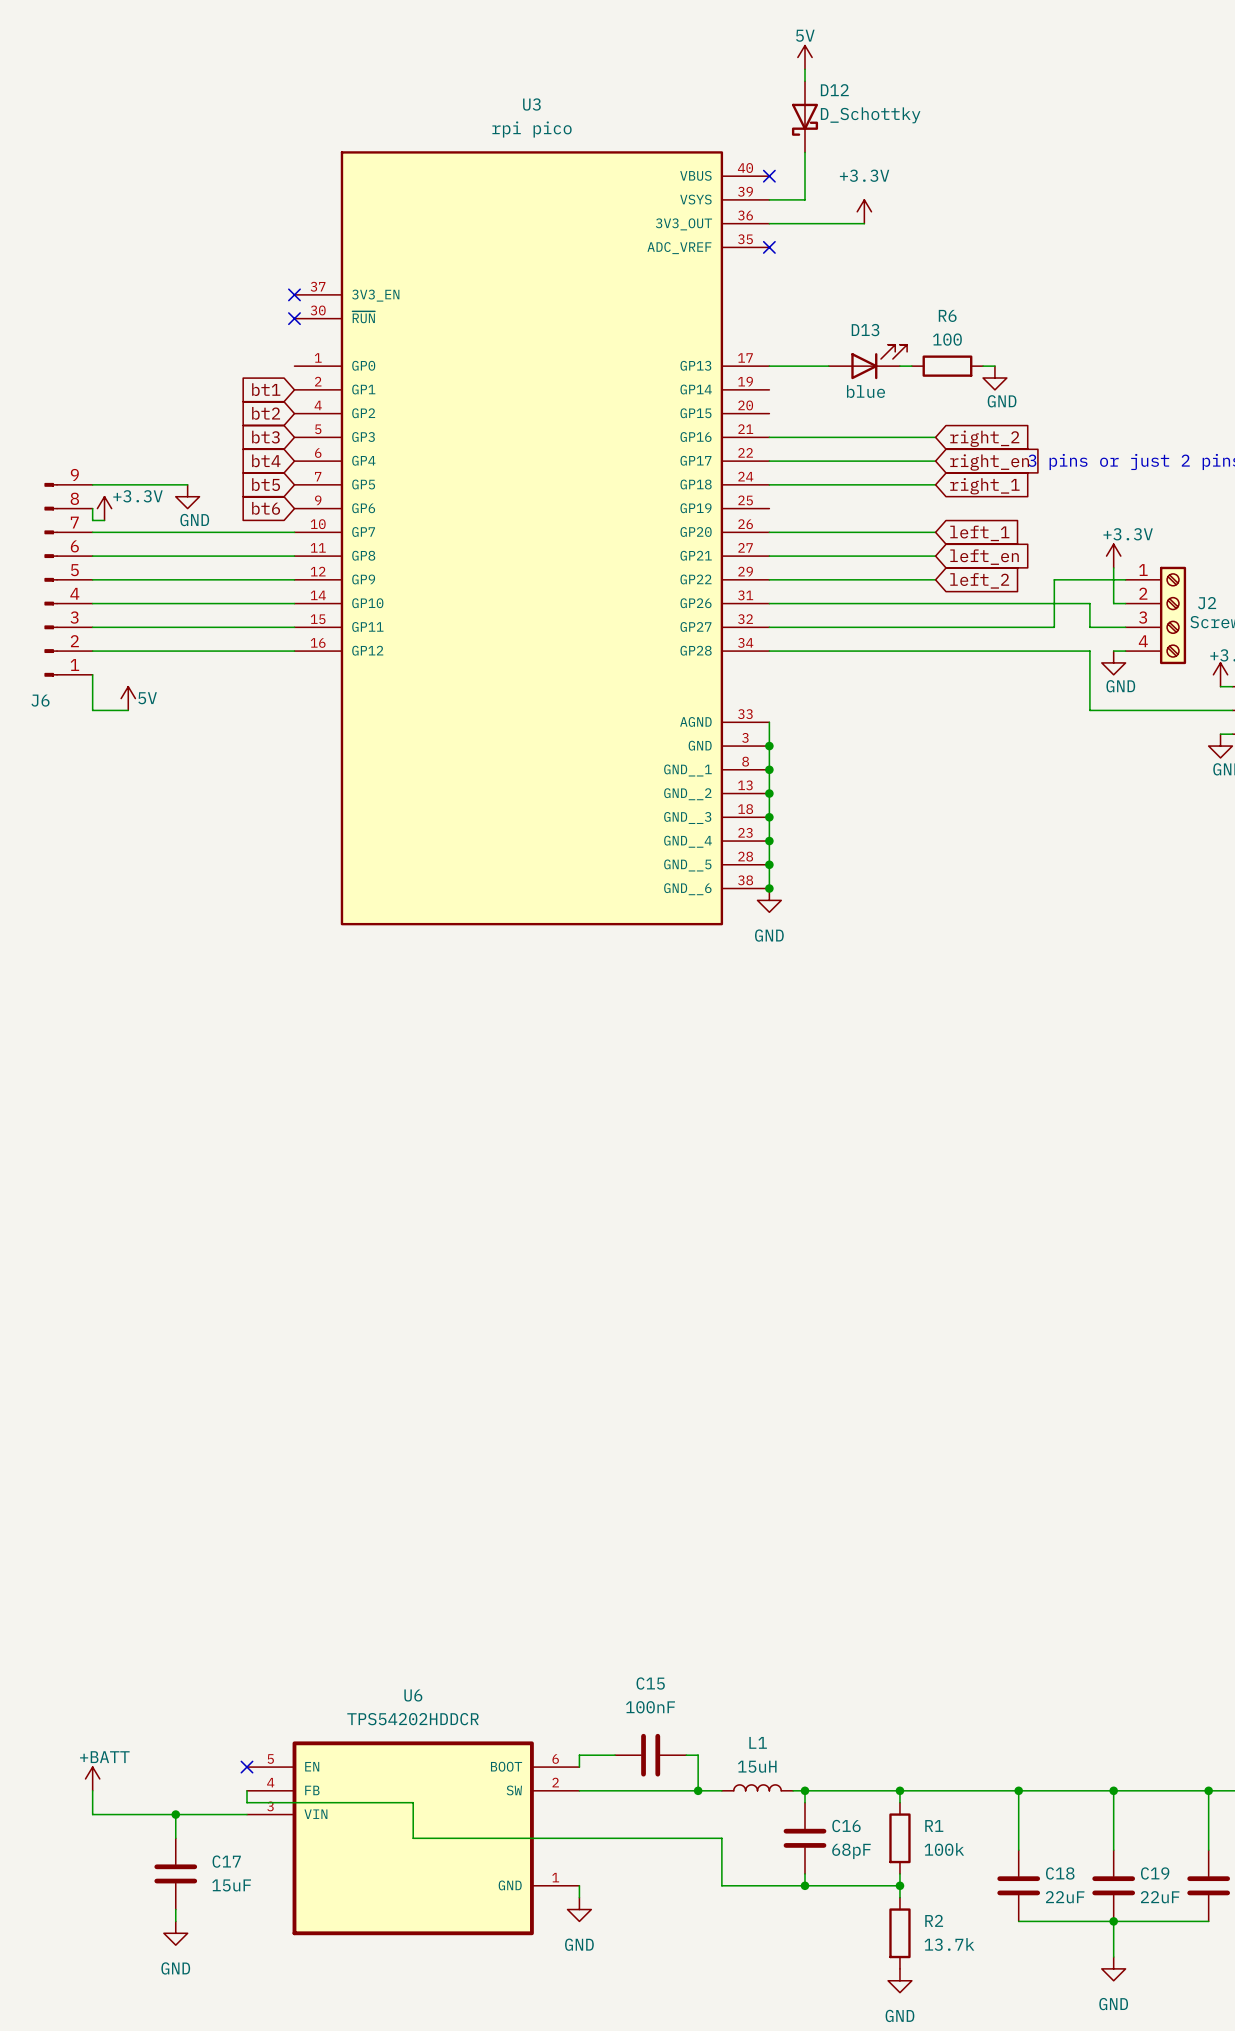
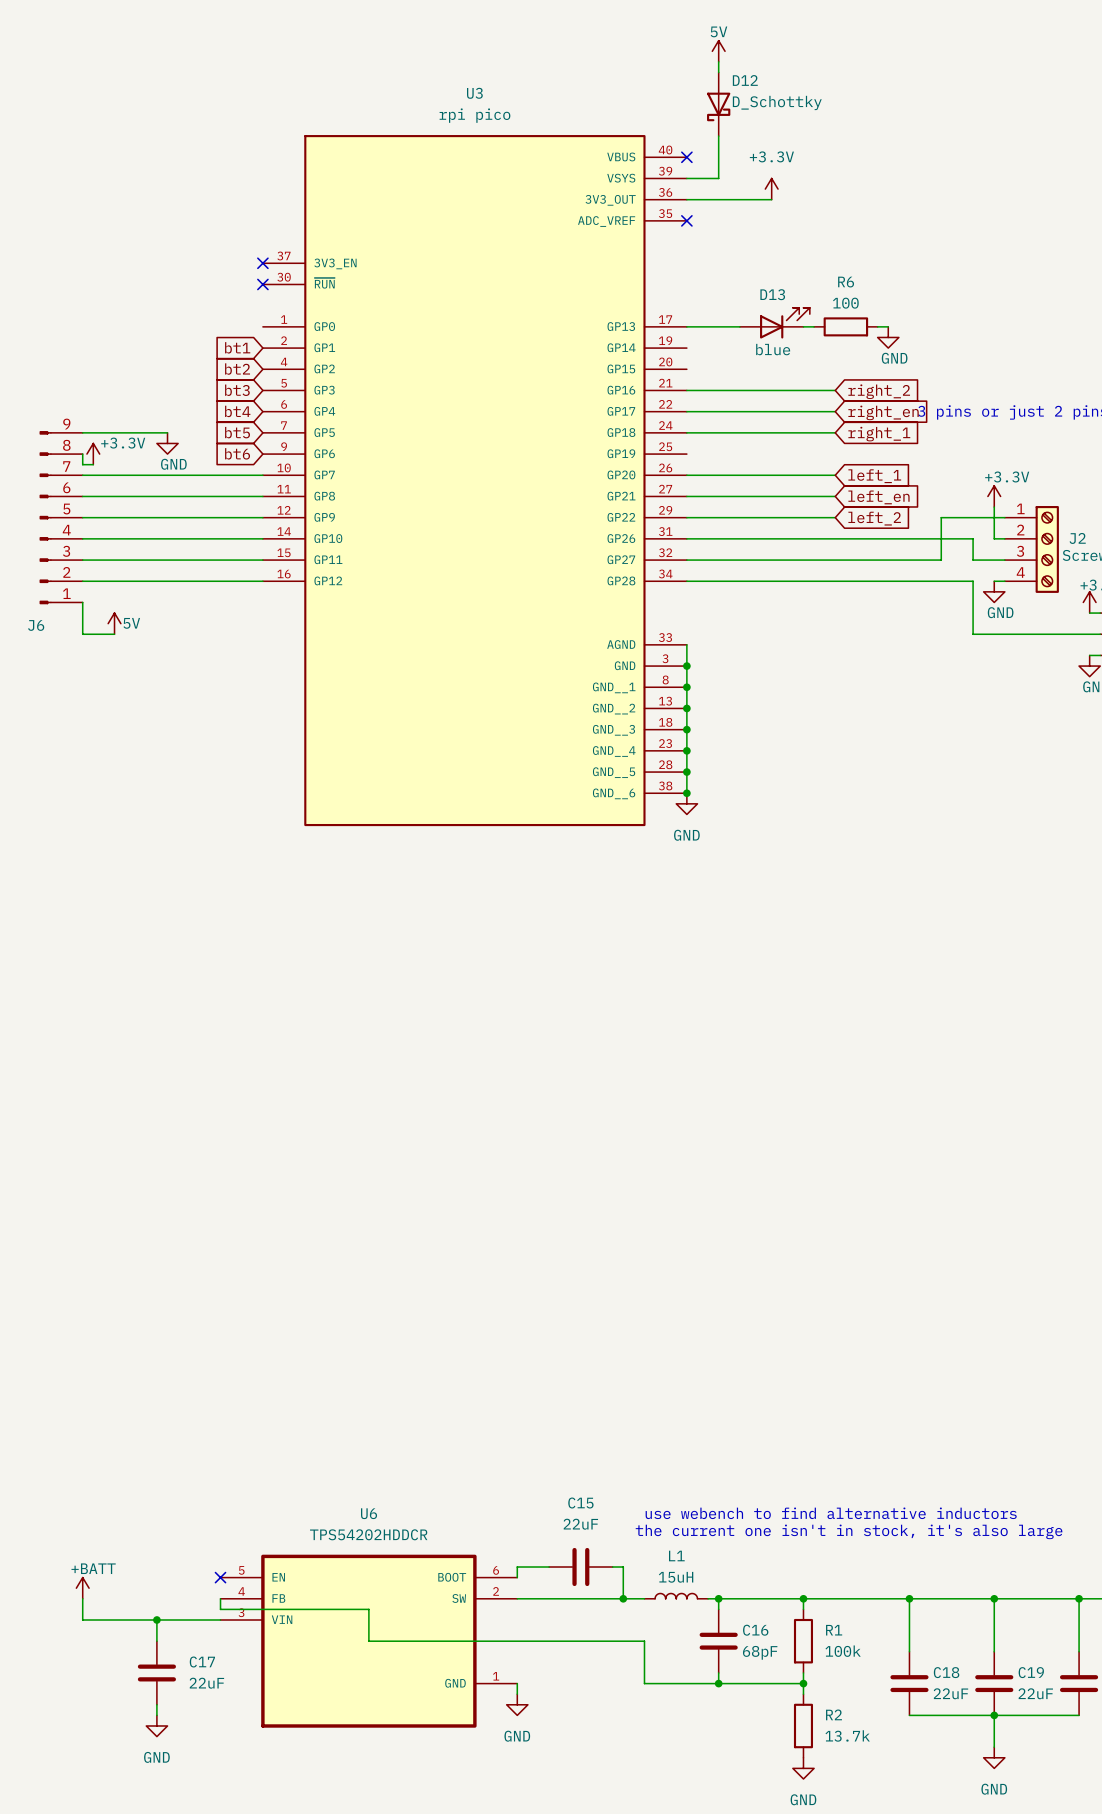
text: none -> use webench to find alternative inductors (831, 1513)
C15 value: 100nF (650, 1707) -> 22uF (580, 1524)
text: none -> the current one isn't in stock, it's also large (849, 1531)
C17 value: 15uF (231, 1885) -> 22uF (206, 1683)

